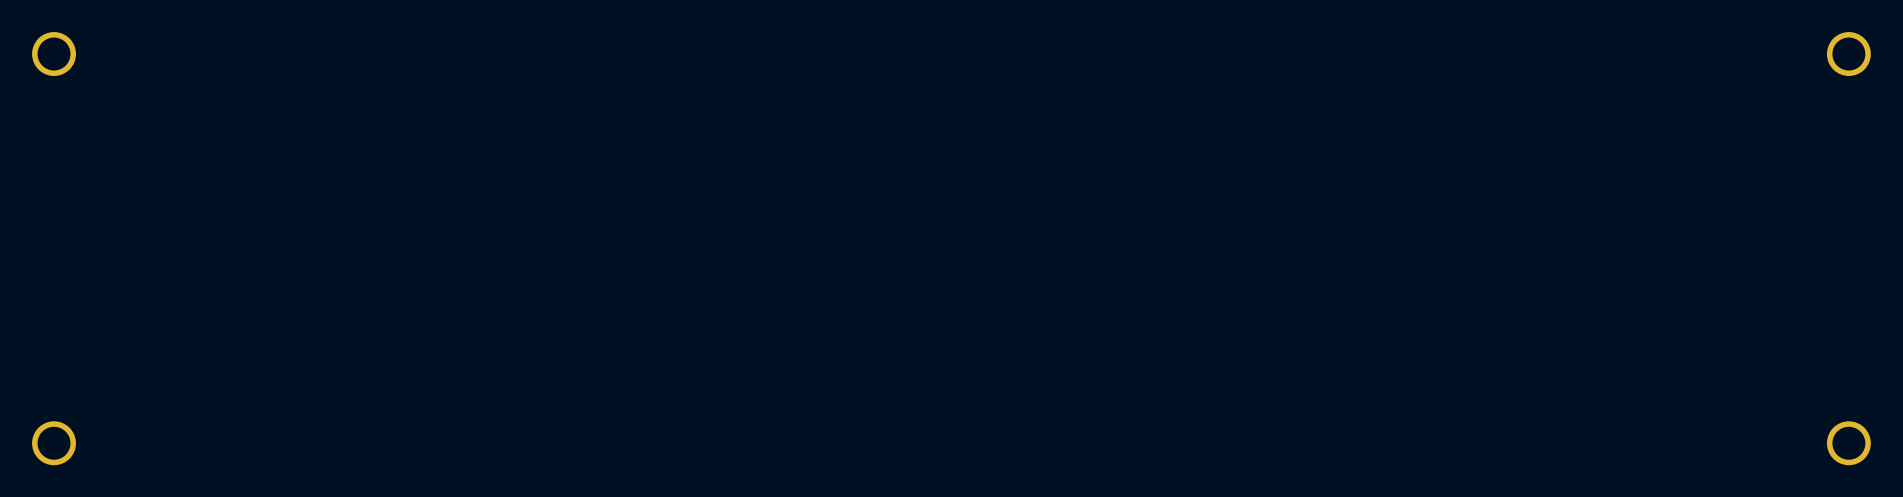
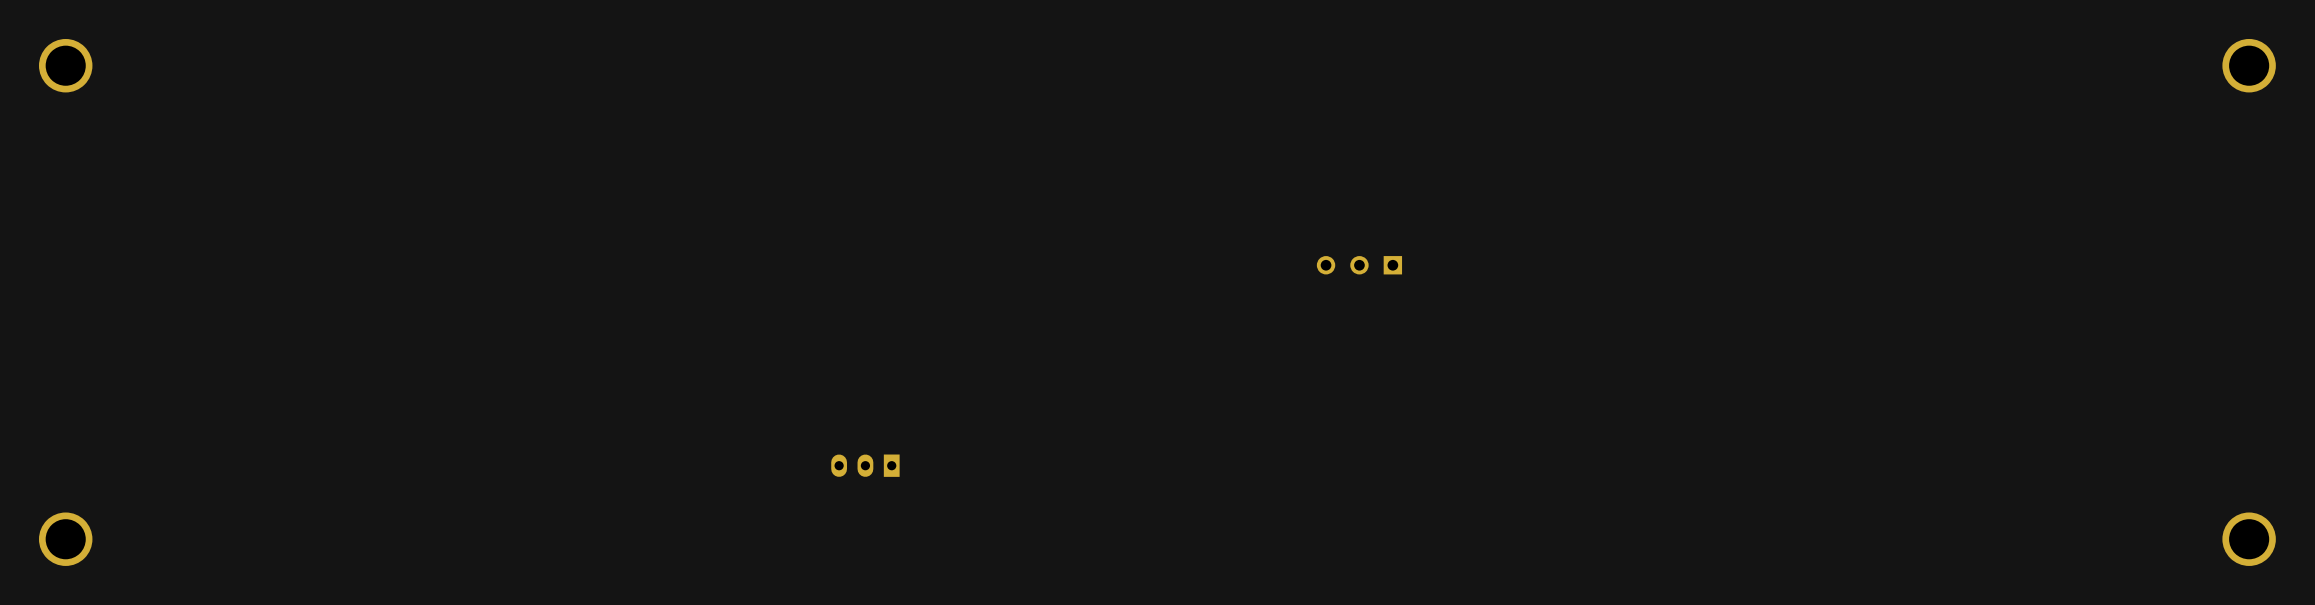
part: none -> (1359, 265)
part: none -> (865, 465)

